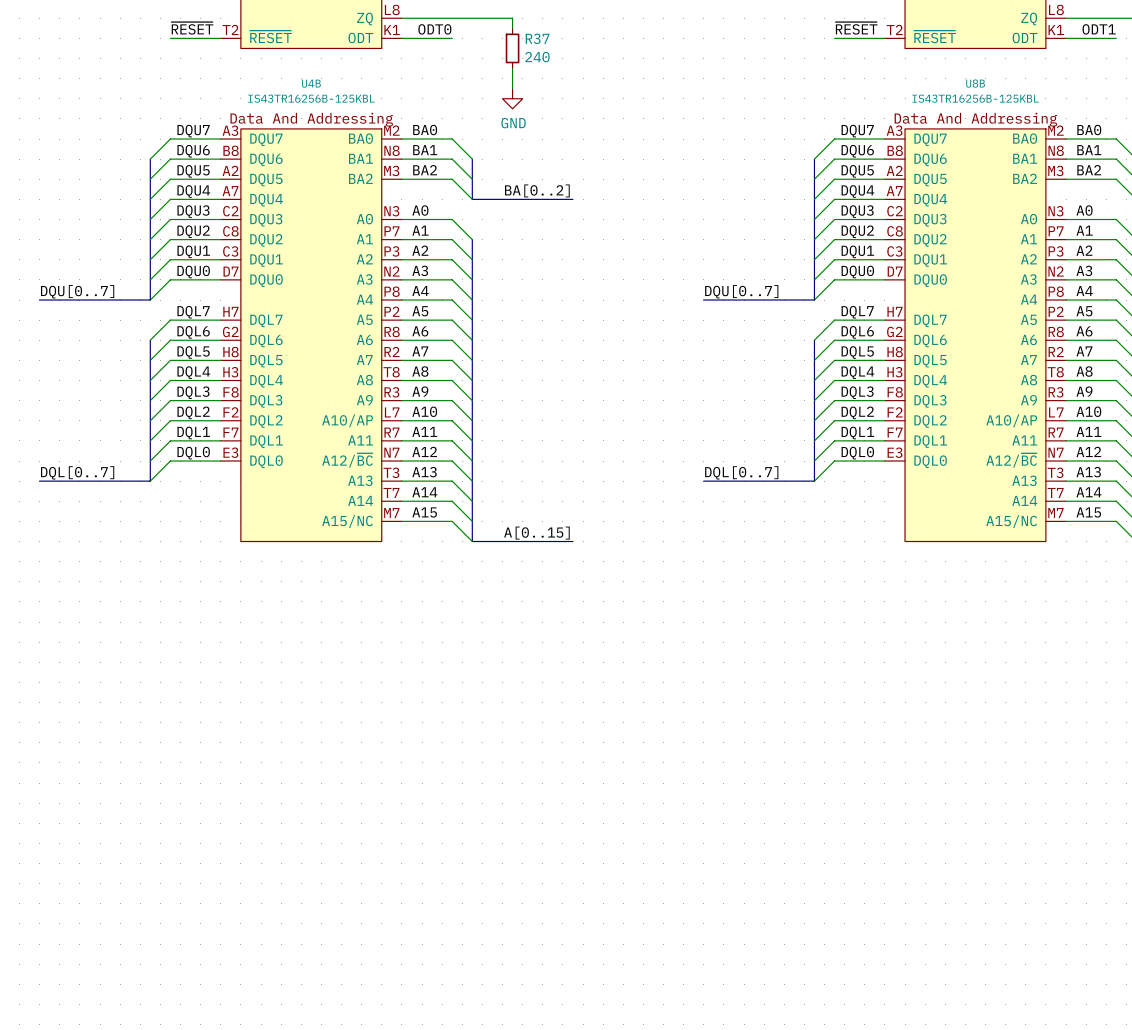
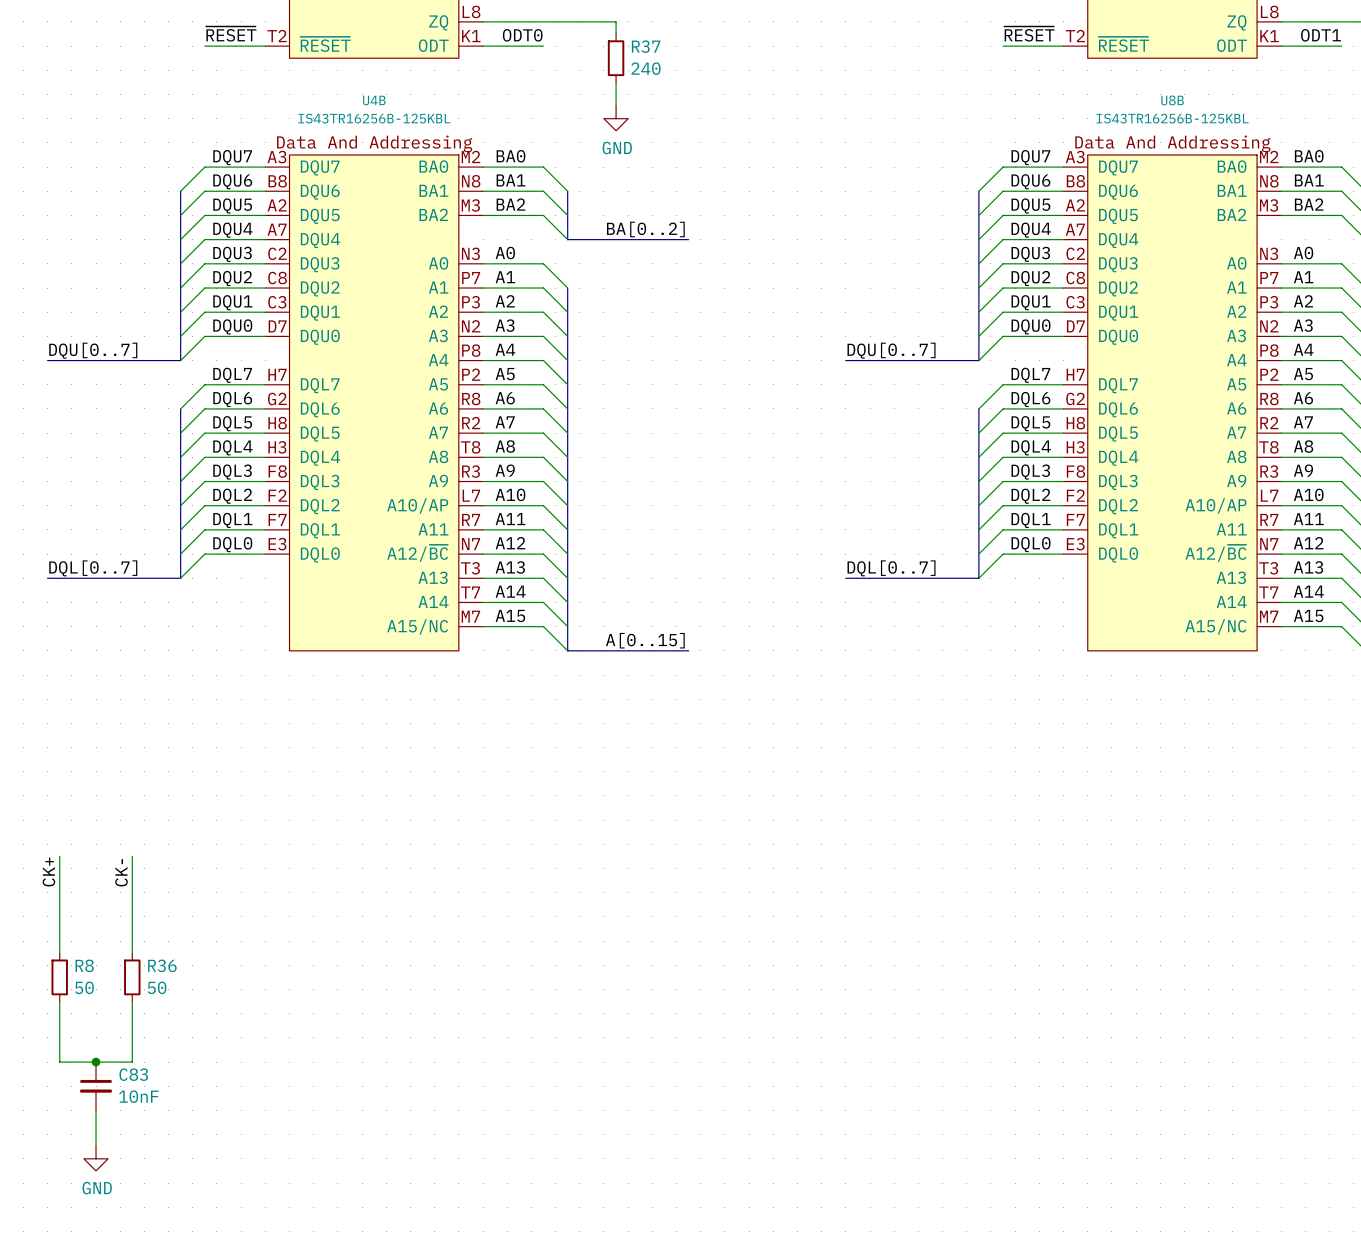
wire: none -> (59, 856) (59, 953)
wire: none -> (132, 856) (132, 953)
label: none -> CK+ (48, 871)
label: none -> CK- (121, 872)
R8: none -> 50 (59, 977)
R36: none -> 50 (132, 977)
wire: none -> (59, 1001) (59, 1062) (132, 1062) (132, 1001)
junction: none -> (96, 1062)
C83: none -> 10nF (96, 1086)
wire: none -> (96, 1110) (96, 1146)
power symbol: none -> GND (96, 1158)

